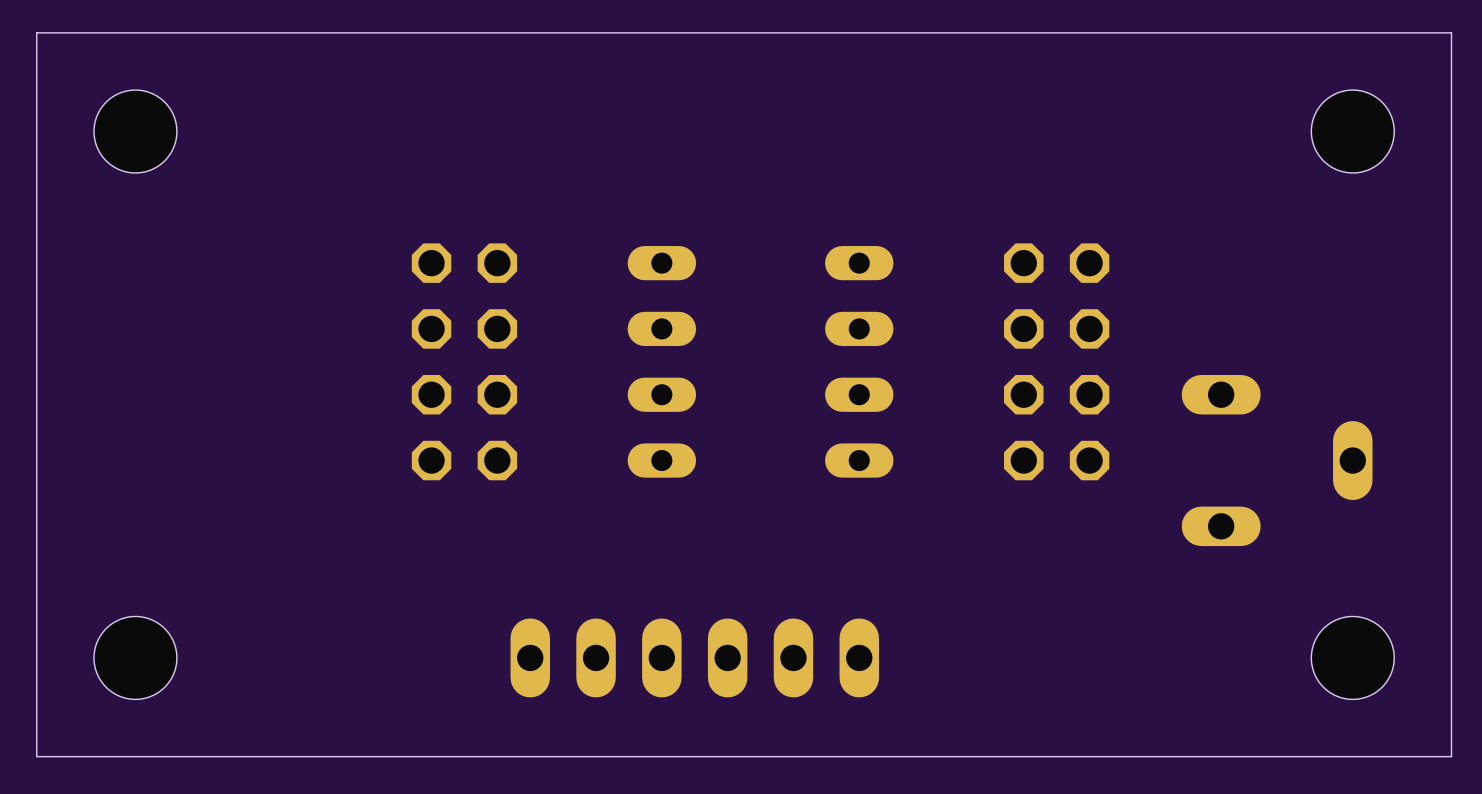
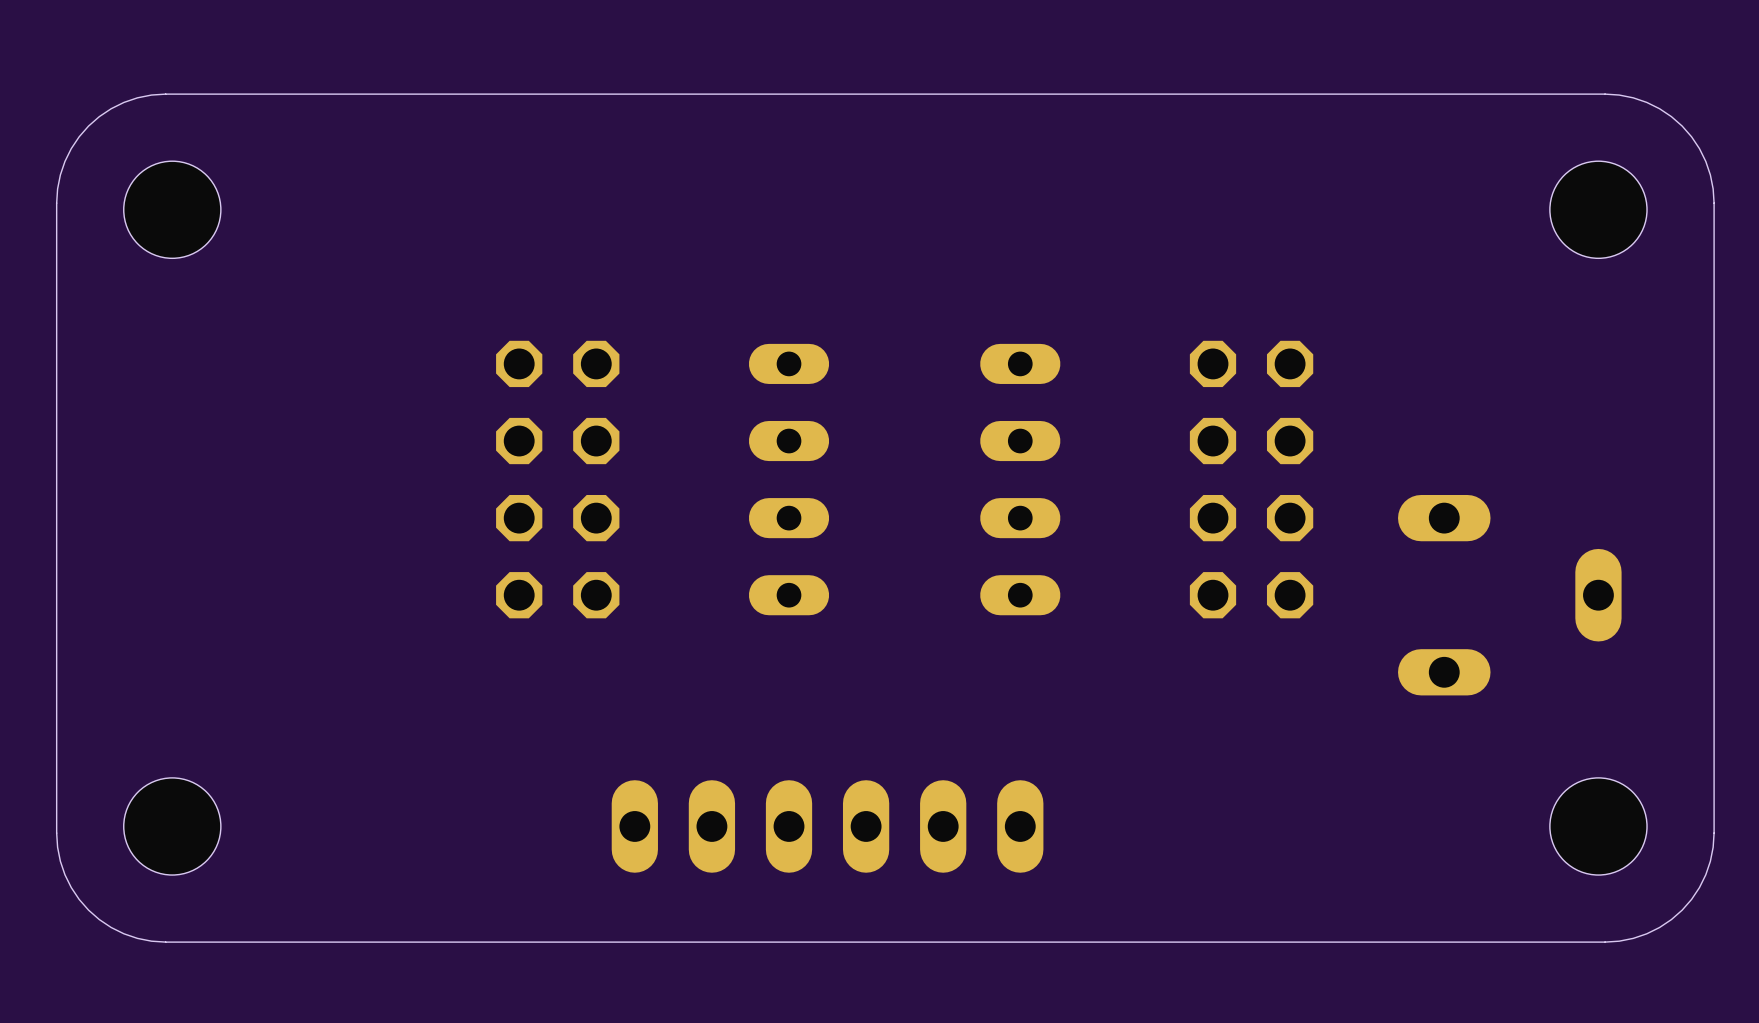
board edge: (129, 32) (36, 32) (36, 125) -> (165, 94) (151, 95) (123, 102) (99, 116) (88, 126) (71, 148) (64, 161) (57, 188) (56, 203)
board edge: (1358, 32) (1451, 32) (1451, 125) -> (1605, 94) (1619, 95) (1646, 102) (1671, 116) (1682, 126) (1699, 148) (1705, 161) (1713, 188) (1714, 203)
board edge: (36, 663) (36, 756) (129, 756) -> (56, 833) (57, 847) (64, 874) (71, 887) (88, 910) (99, 919) (123, 933) (151, 941) (165, 942)
board edge: (1451, 663) (1451, 756) (1358, 756) -> (1714, 833) (1713, 847) (1705, 874) (1691, 899) (1682, 910) (1659, 927) (1646, 933) (1619, 941) (1605, 942)

